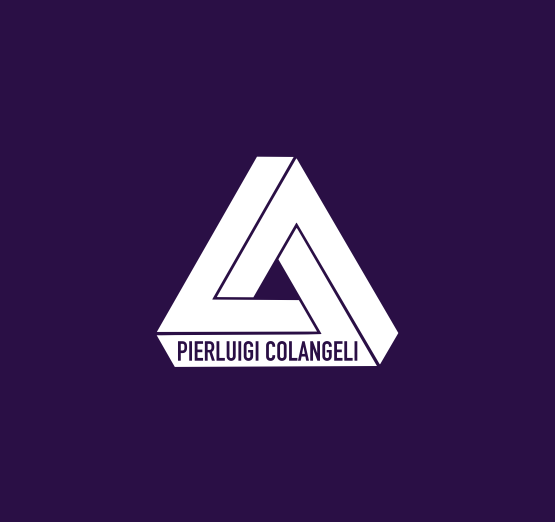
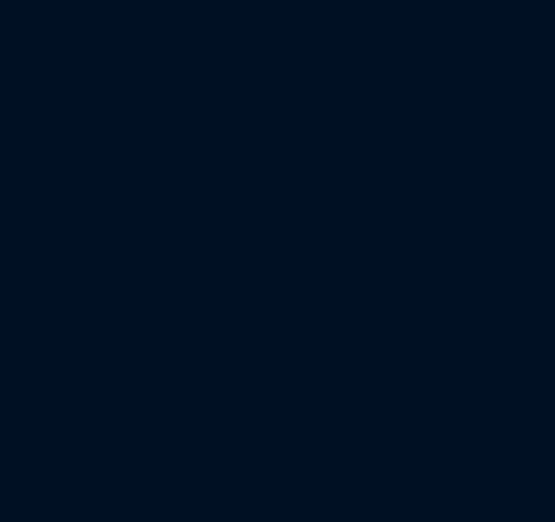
drawing: [156, 156, 399, 367] -> none

